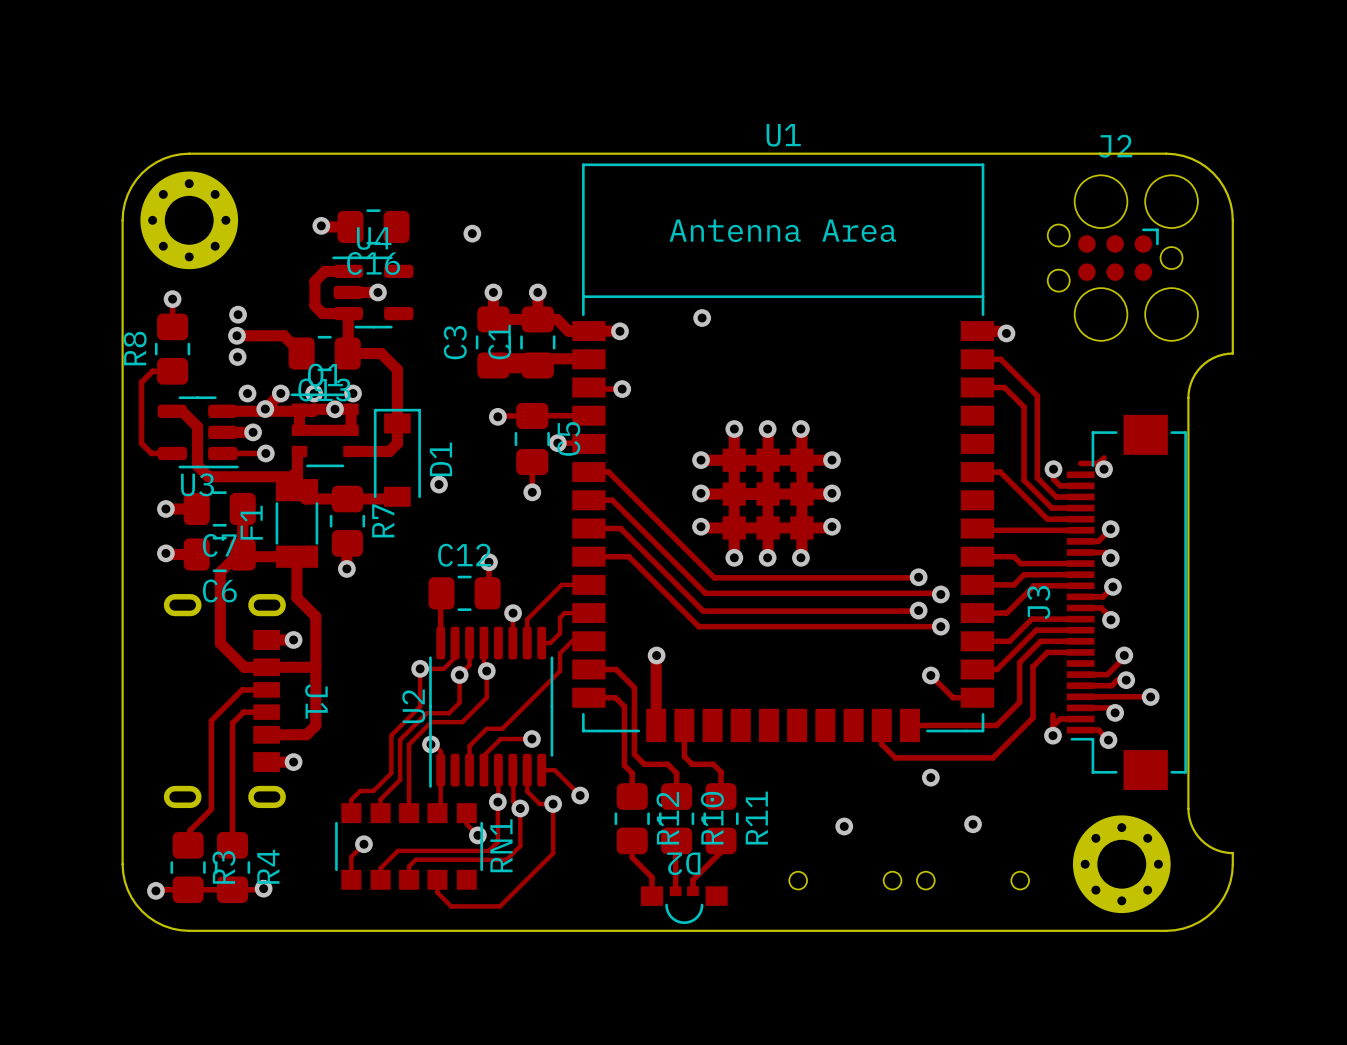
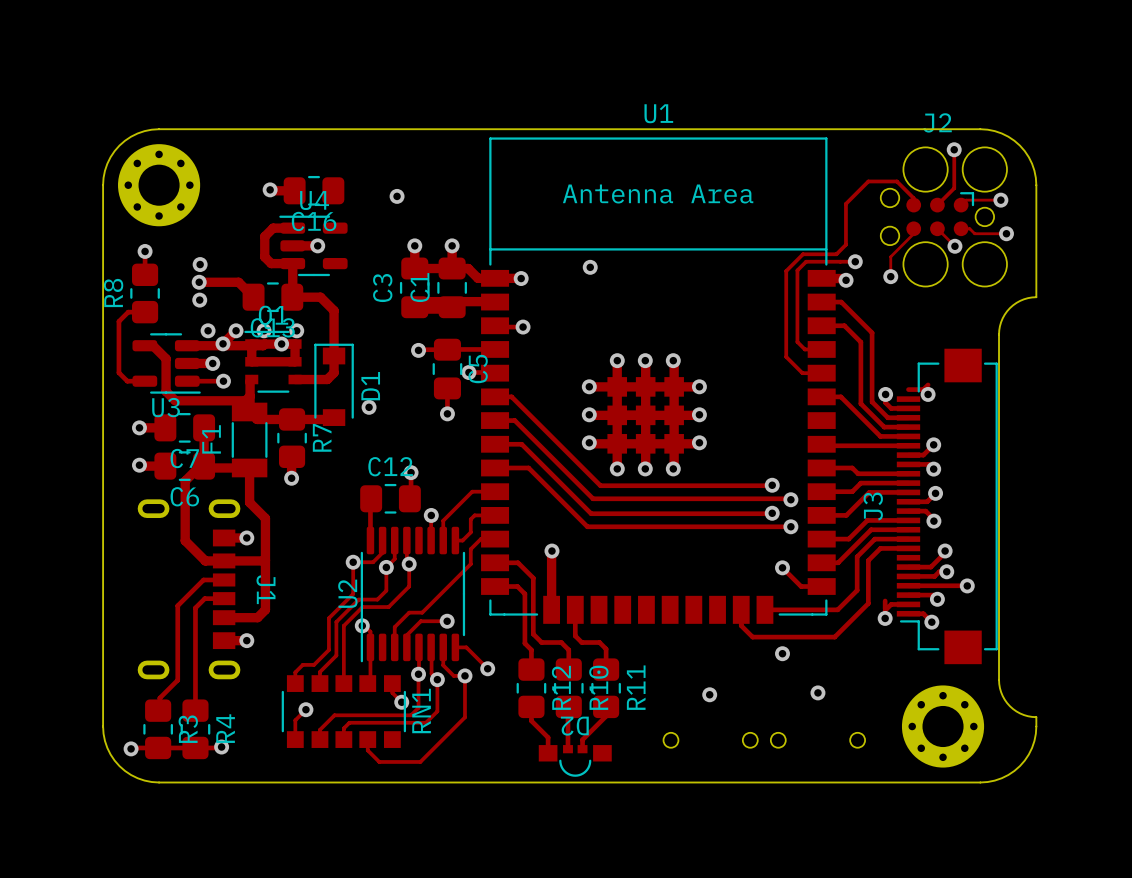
track: none -> (954, 149) (954, 188) (937, 205)
via: none -> (954, 149)
track: none -> (1000, 200) (966, 200) (961, 205)
via: none -> (1000, 200)
track: none -> (913, 205) (913, 198) (896, 181) (868, 181) (845, 203) (845, 244) (836, 254) (803, 254) (786, 271) (786, 356) (802, 373) (821, 373)
track: none -> (913, 228) (913, 233) (890, 256) (890, 276)
track: none -> (937, 228) (954, 246)
track: none -> (961, 228) (969, 228) (974, 233) (1006, 233)
via: none -> (1006, 233)
via: none -> (954, 246)
track: none -> (855, 261) (806, 261) (797, 270) (797, 341) (804, 349) (821, 349)
via: none -> (855, 261)
via: none -> (890, 276)

